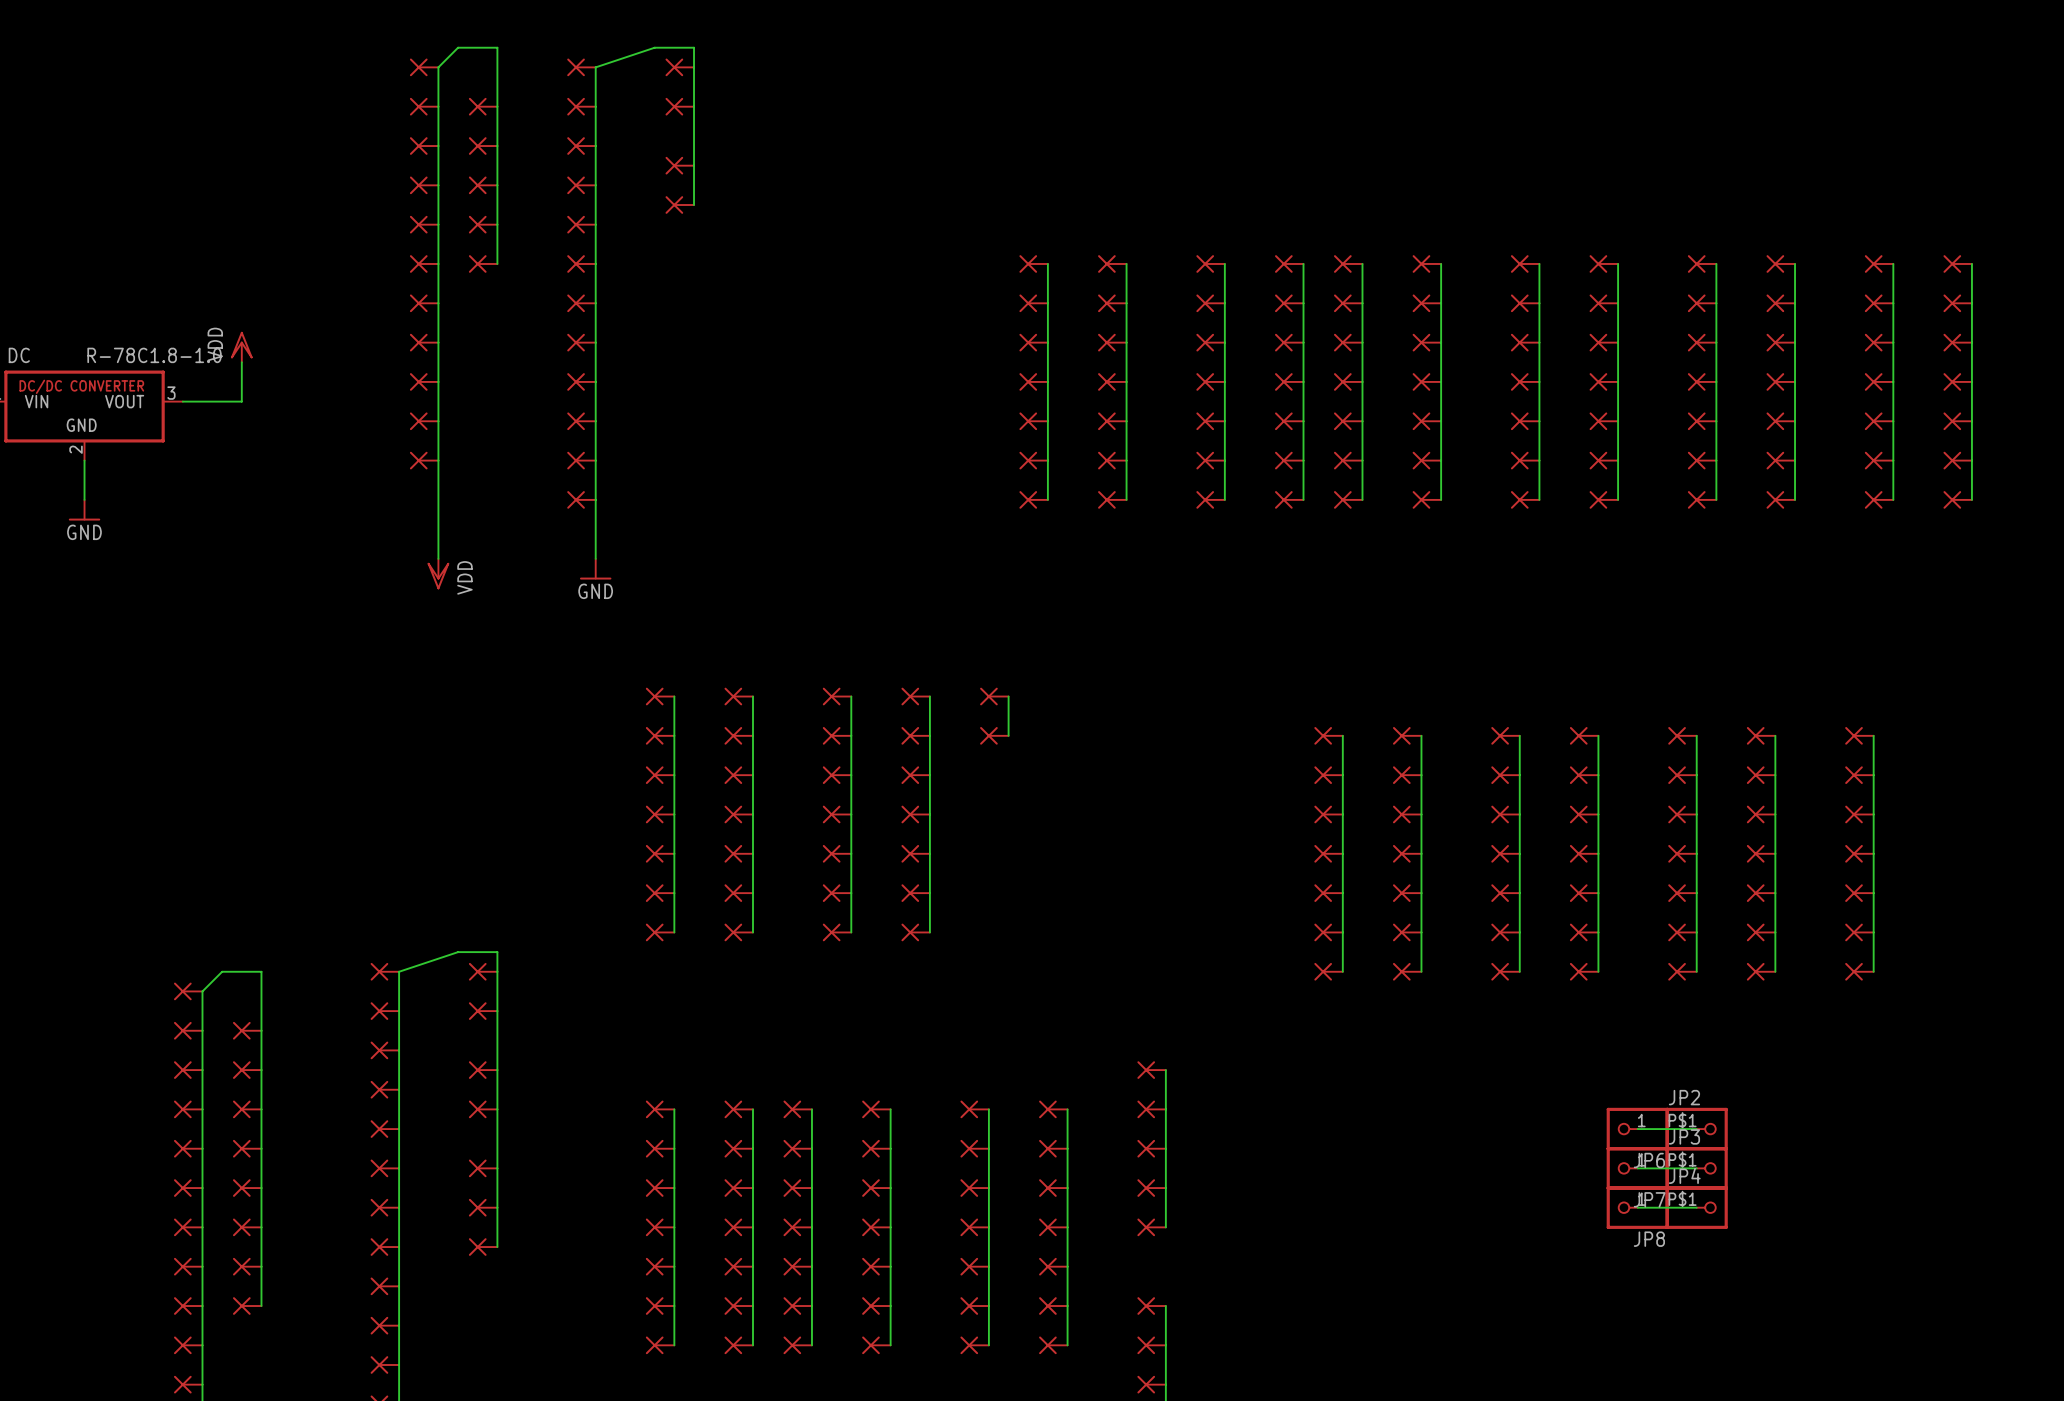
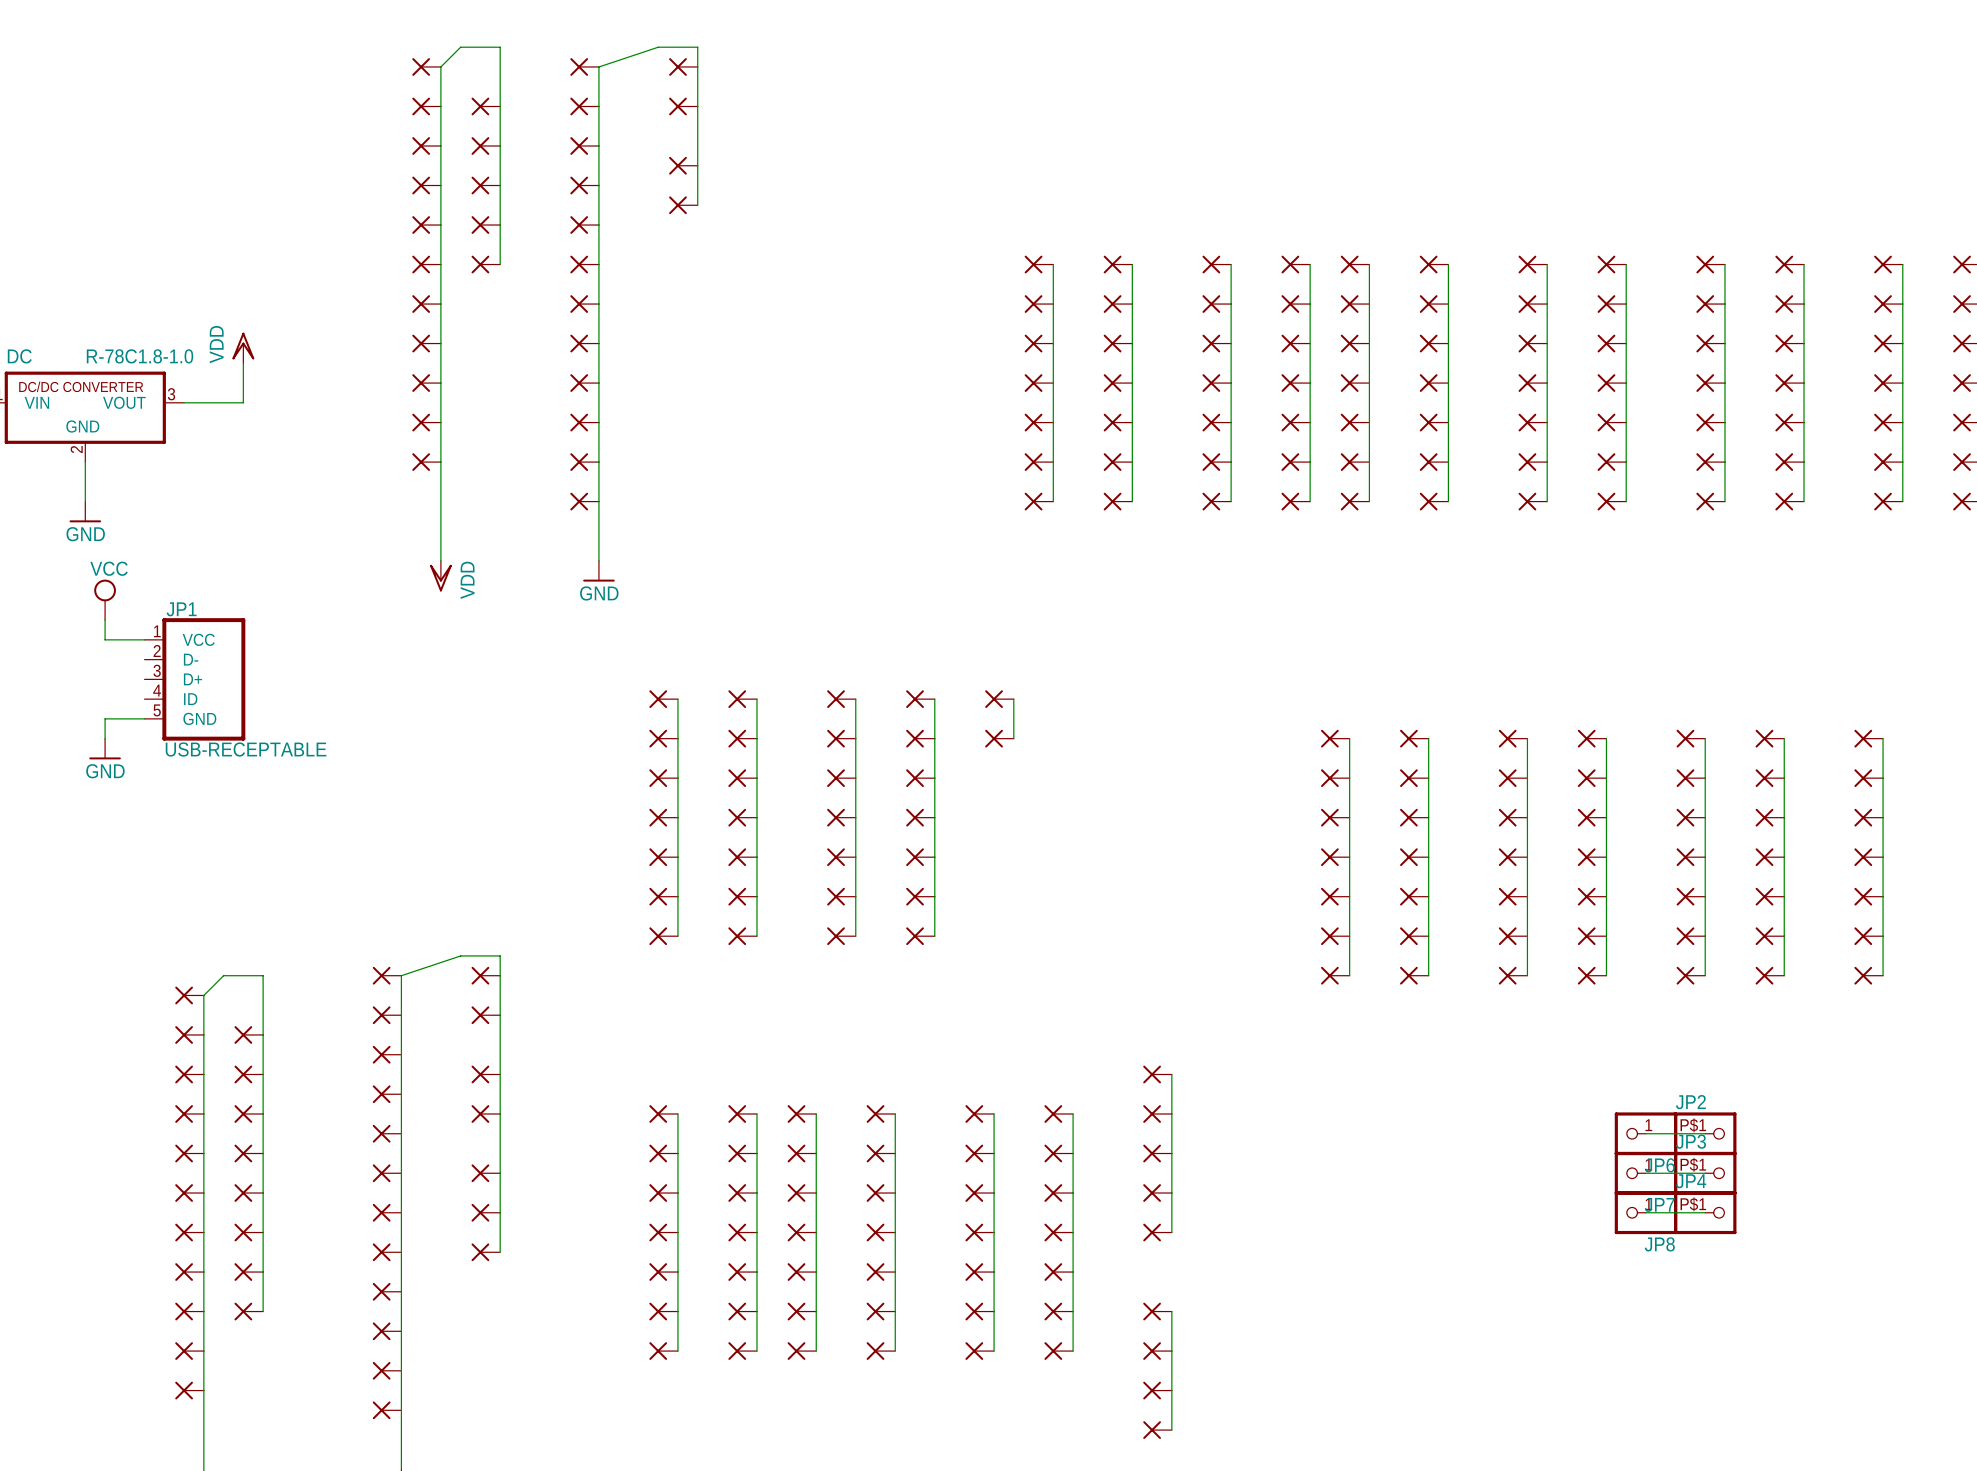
power symbol: none -> VCC (105, 599)
wire: none -> (105, 620) (105, 639) (144, 639)
JP1: none -> USB-RECEPTABLE (194, 679)
wire: none -> (144, 718) (105, 718) (105, 738)
power symbol: none -> GND (105, 749)

